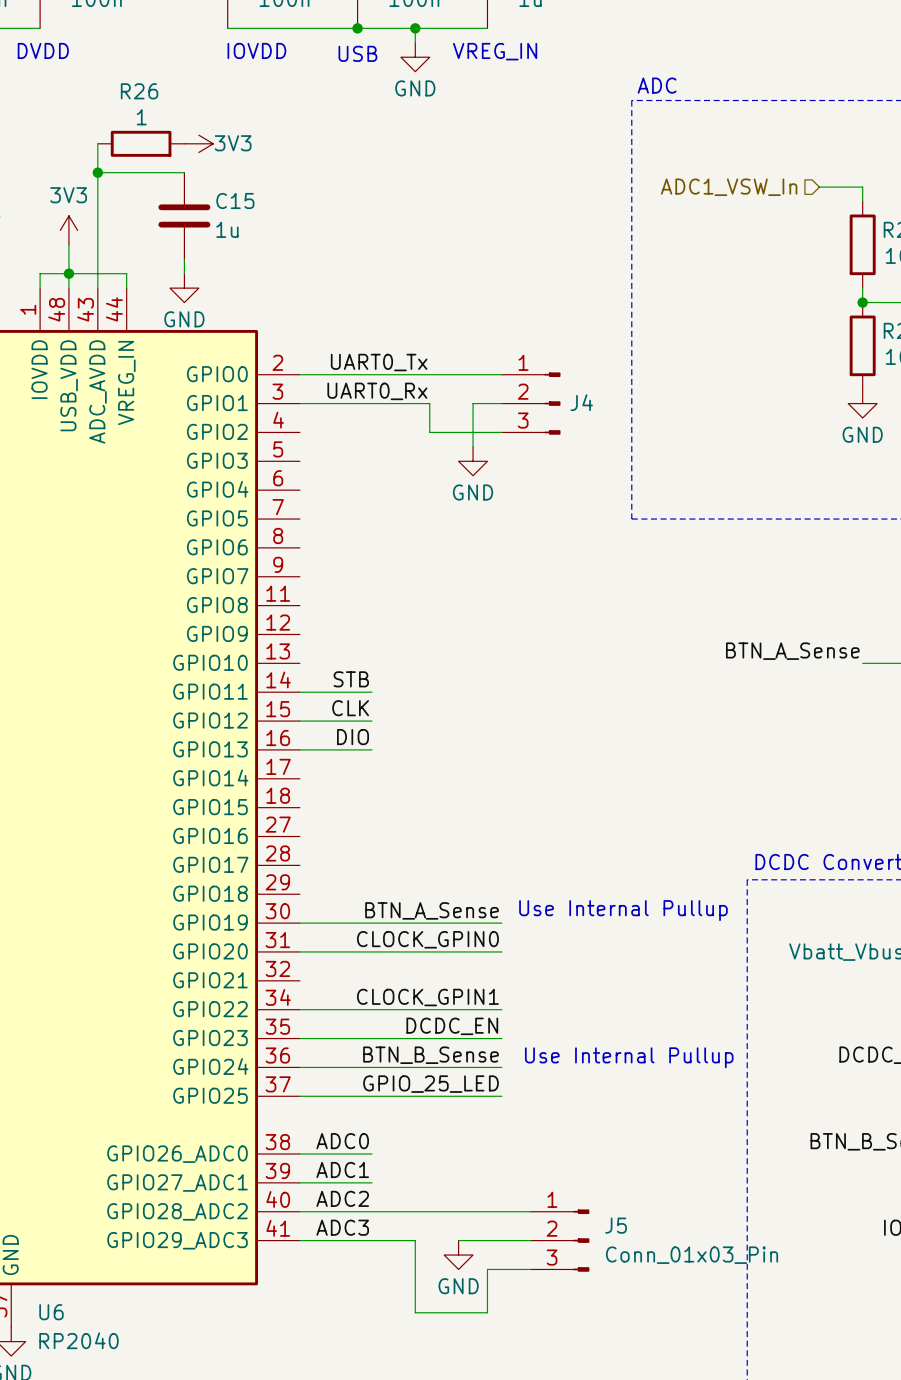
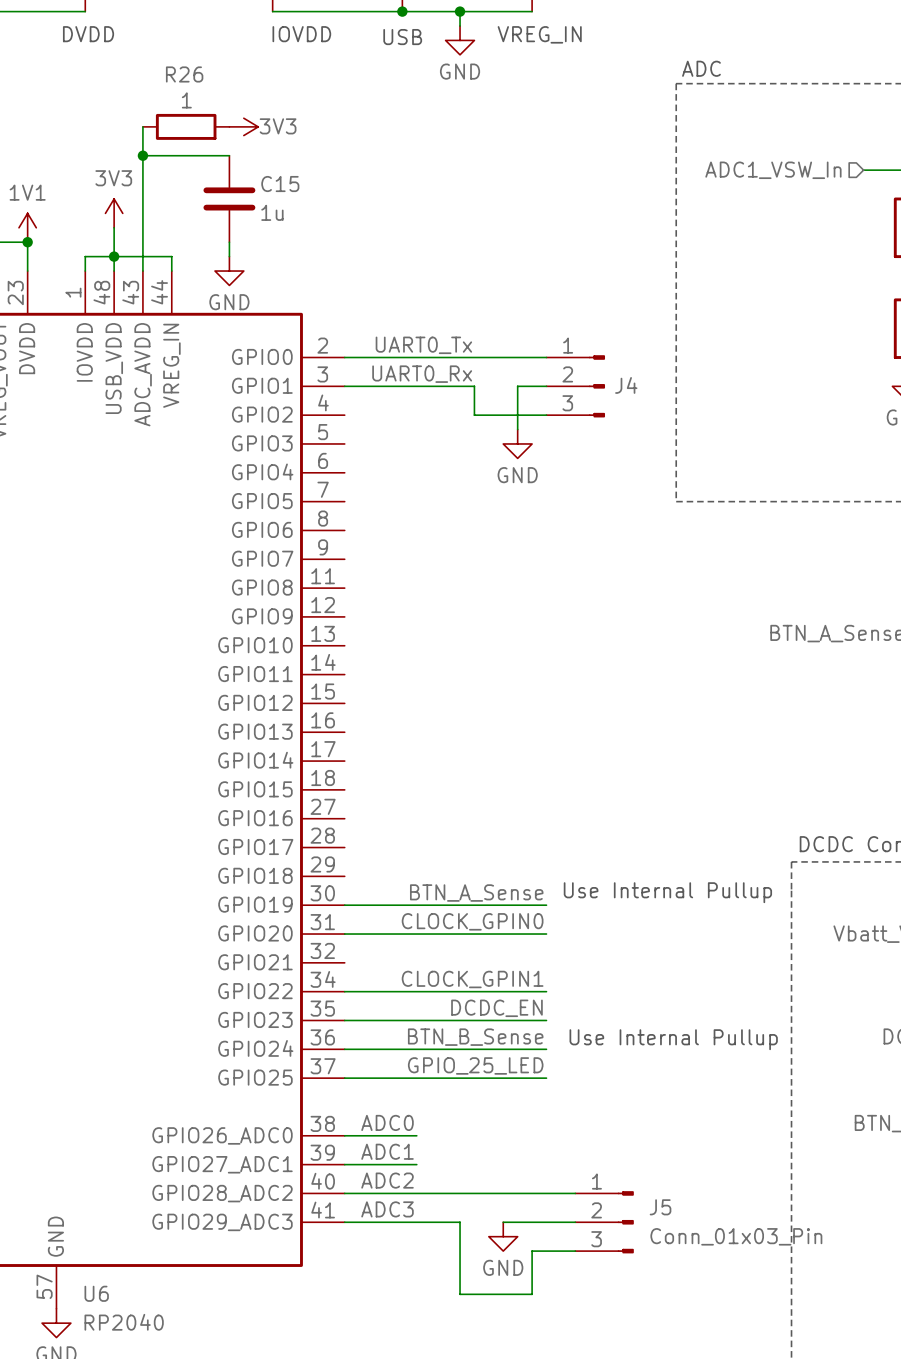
label: STB (351, 679) -> none
wire: (299, 692) (372, 692) -> none
label: CLK (350, 708) -> none
wire: (299, 721) (372, 721) -> none
label: DIO (353, 737) -> none
wire: (299, 749) (372, 749) -> none

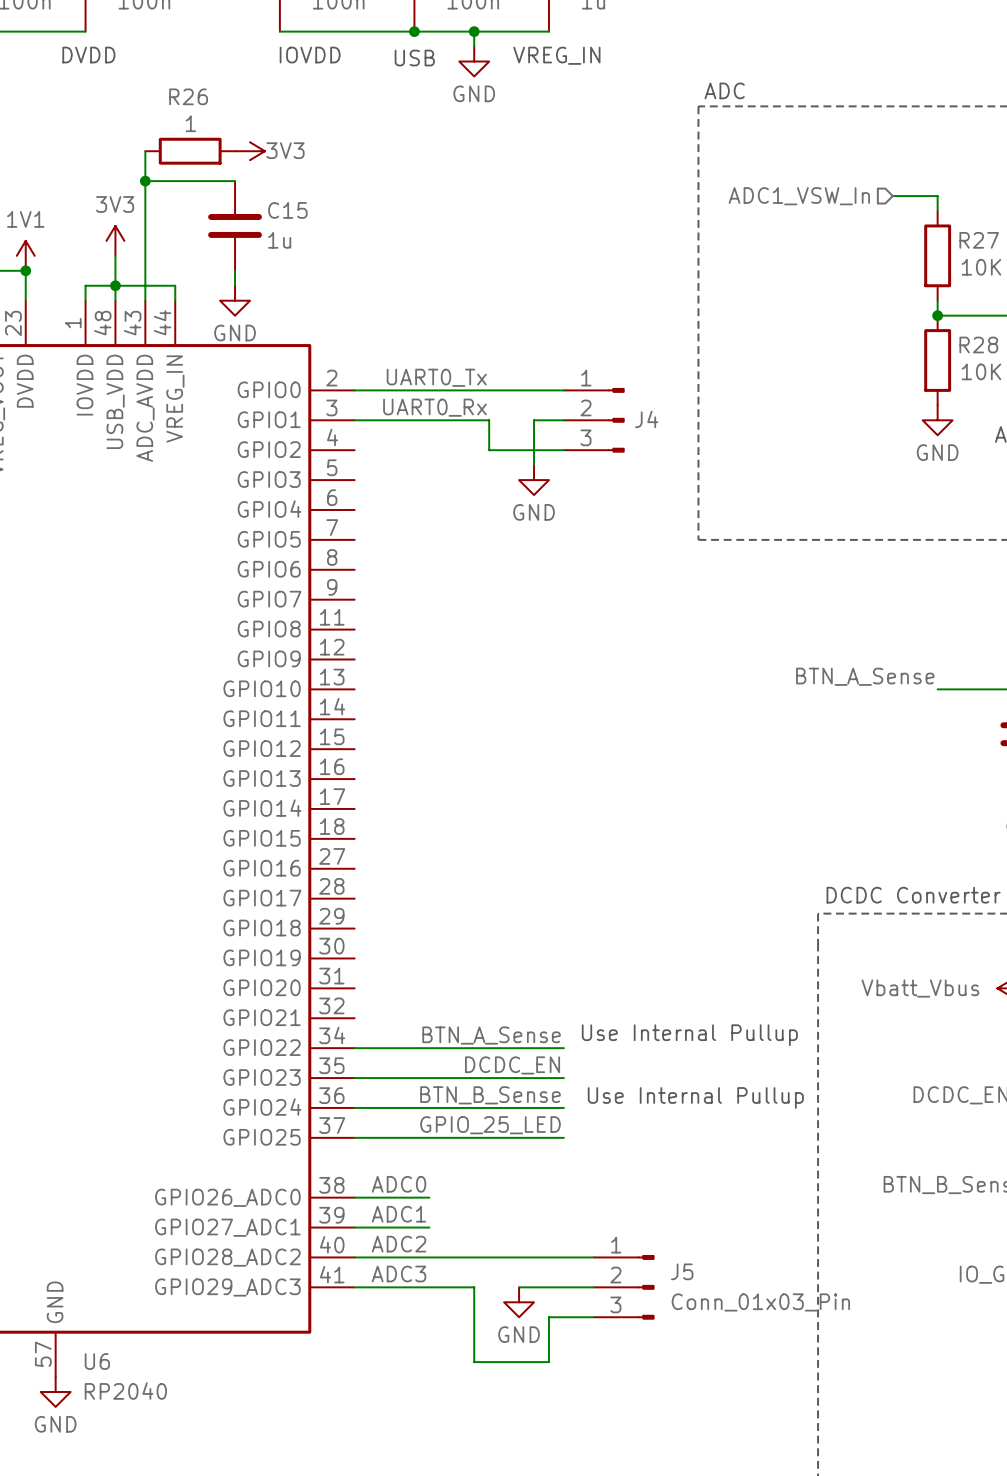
text position: Use Internal Pullup (667, 892) -> Use Internal Pullup (689, 1035)
label: BTN_A_Sense (476, 893) -> none
wire: (344, 905) (546, 905) -> none
label: CLOCK_GPIN0 (472, 921) -> none
wire: (344, 934) (546, 934) -> none
label: CLOCK_GPIN1 (472, 979) -> BTN_A_Sense (491, 1035)

